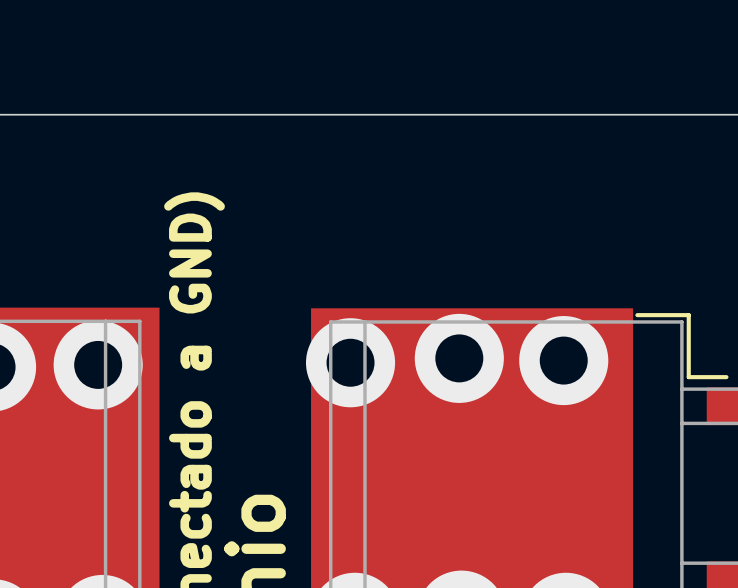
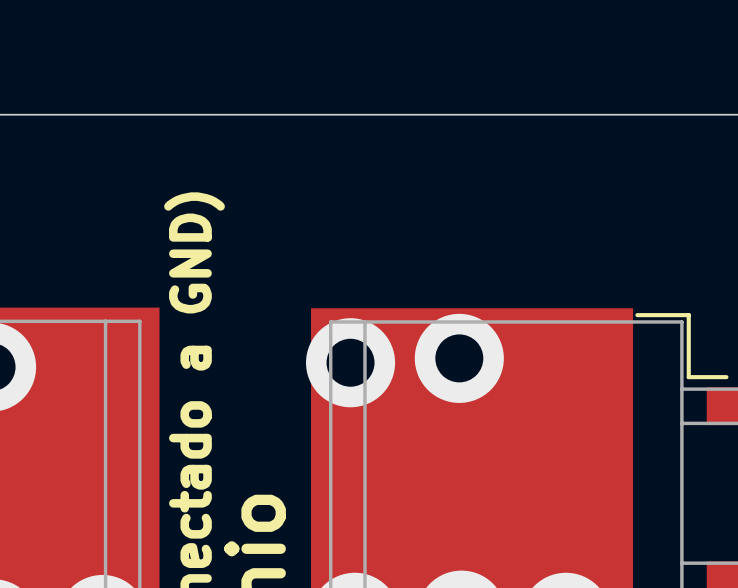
via: (563, 360) -> none
via: (98, 364) -> none

